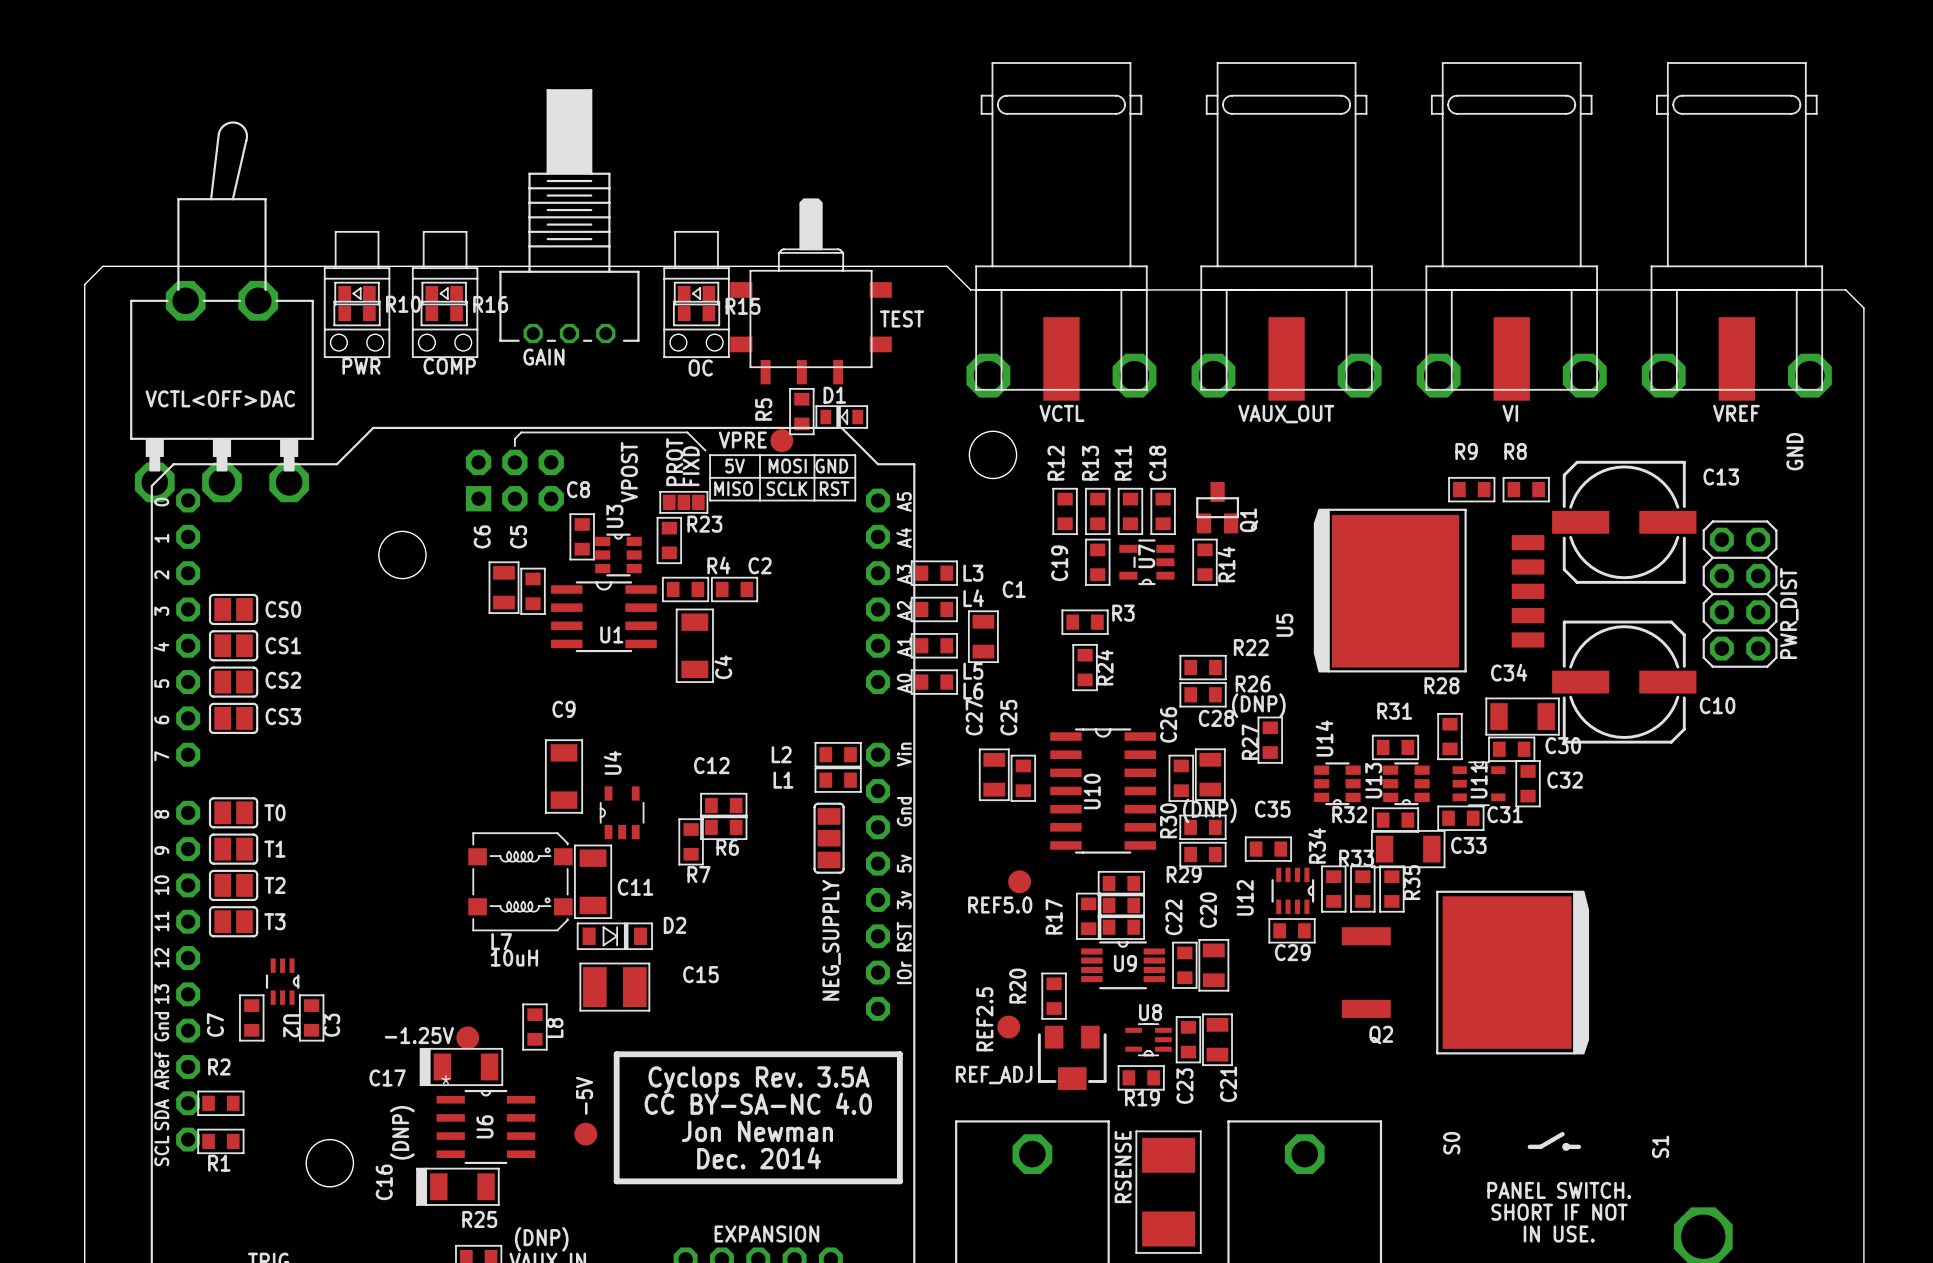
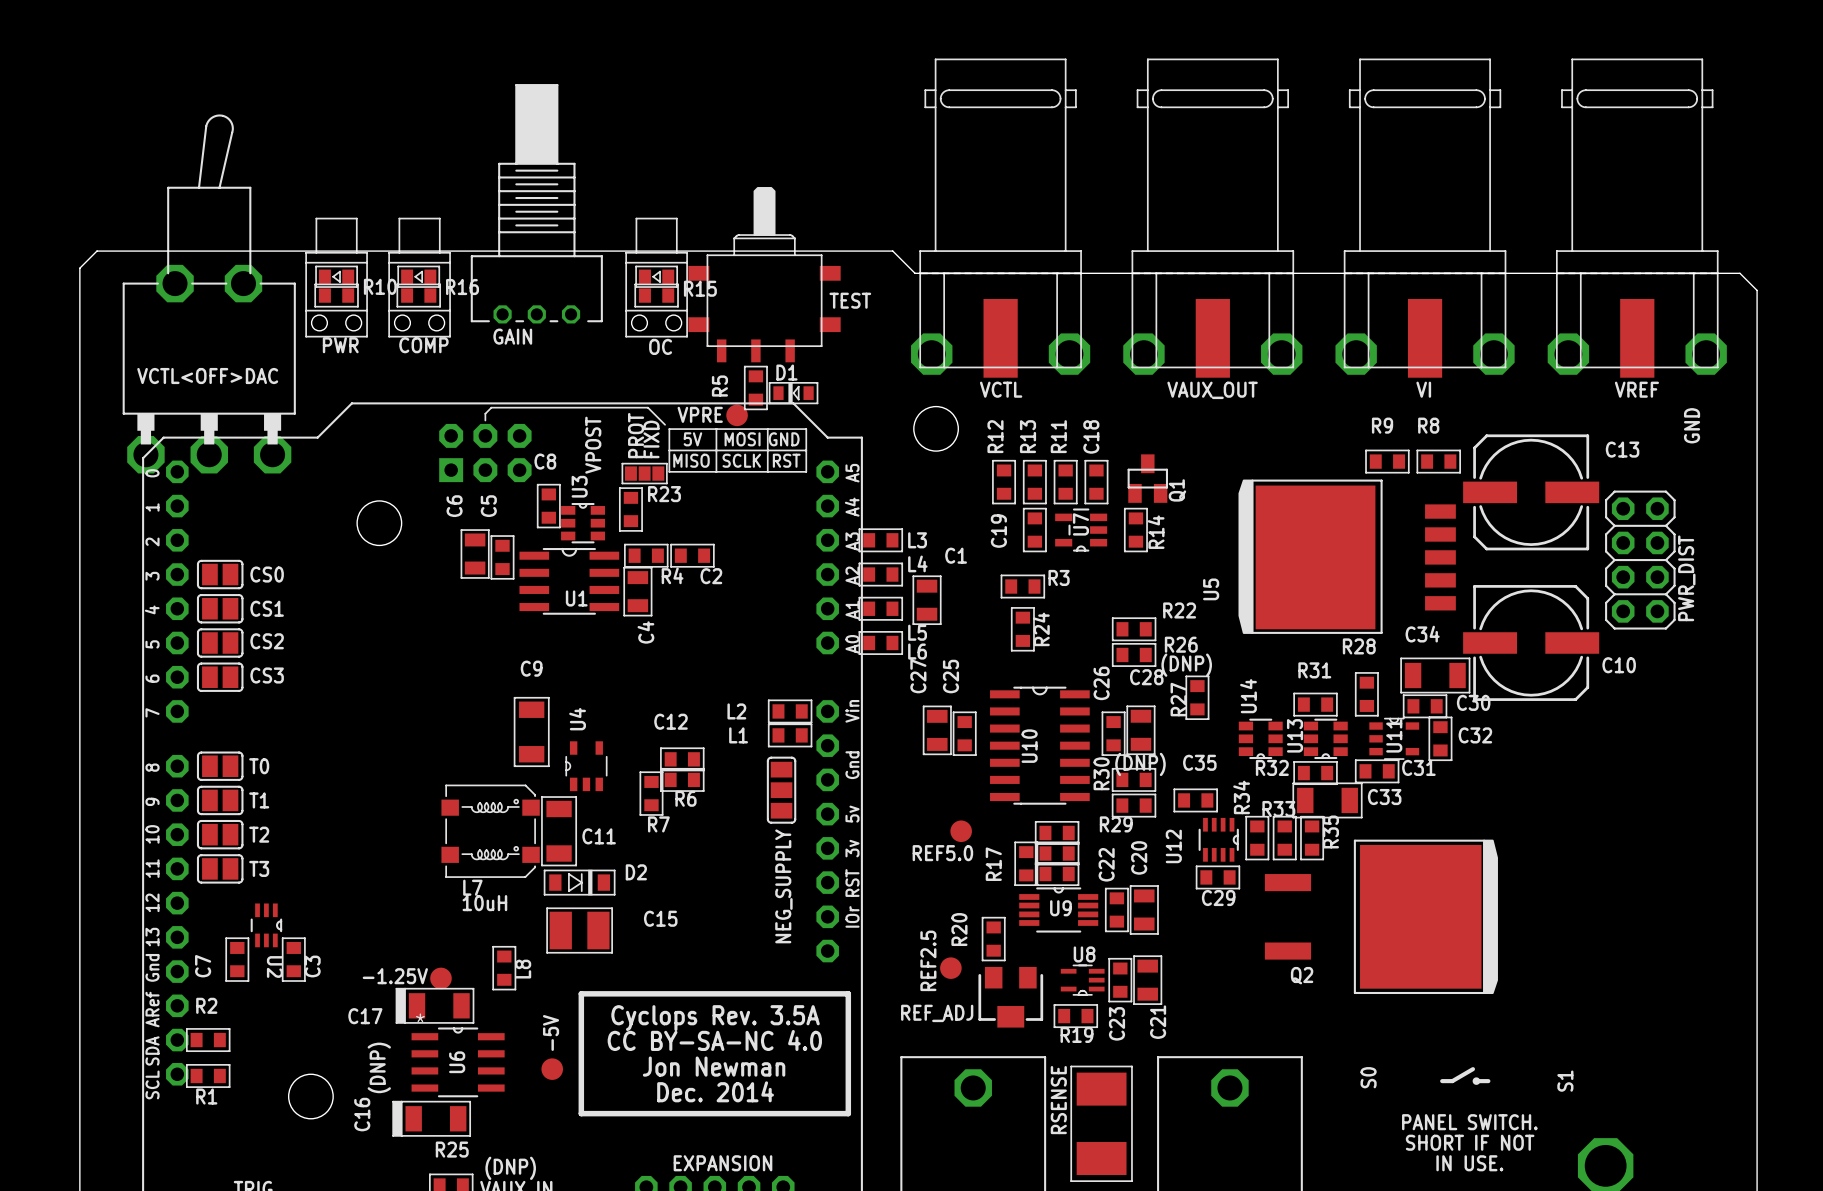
R4 name position: R4 (718, 565) -> R4 (672, 575)
C2 name position: C2 (760, 565) -> C2 (711, 576)
C4 footprint: [675, 608, 714, 683] -> [623, 566, 653, 617]
C4 name position: C4 (723, 667) -> C4 (645, 632)

